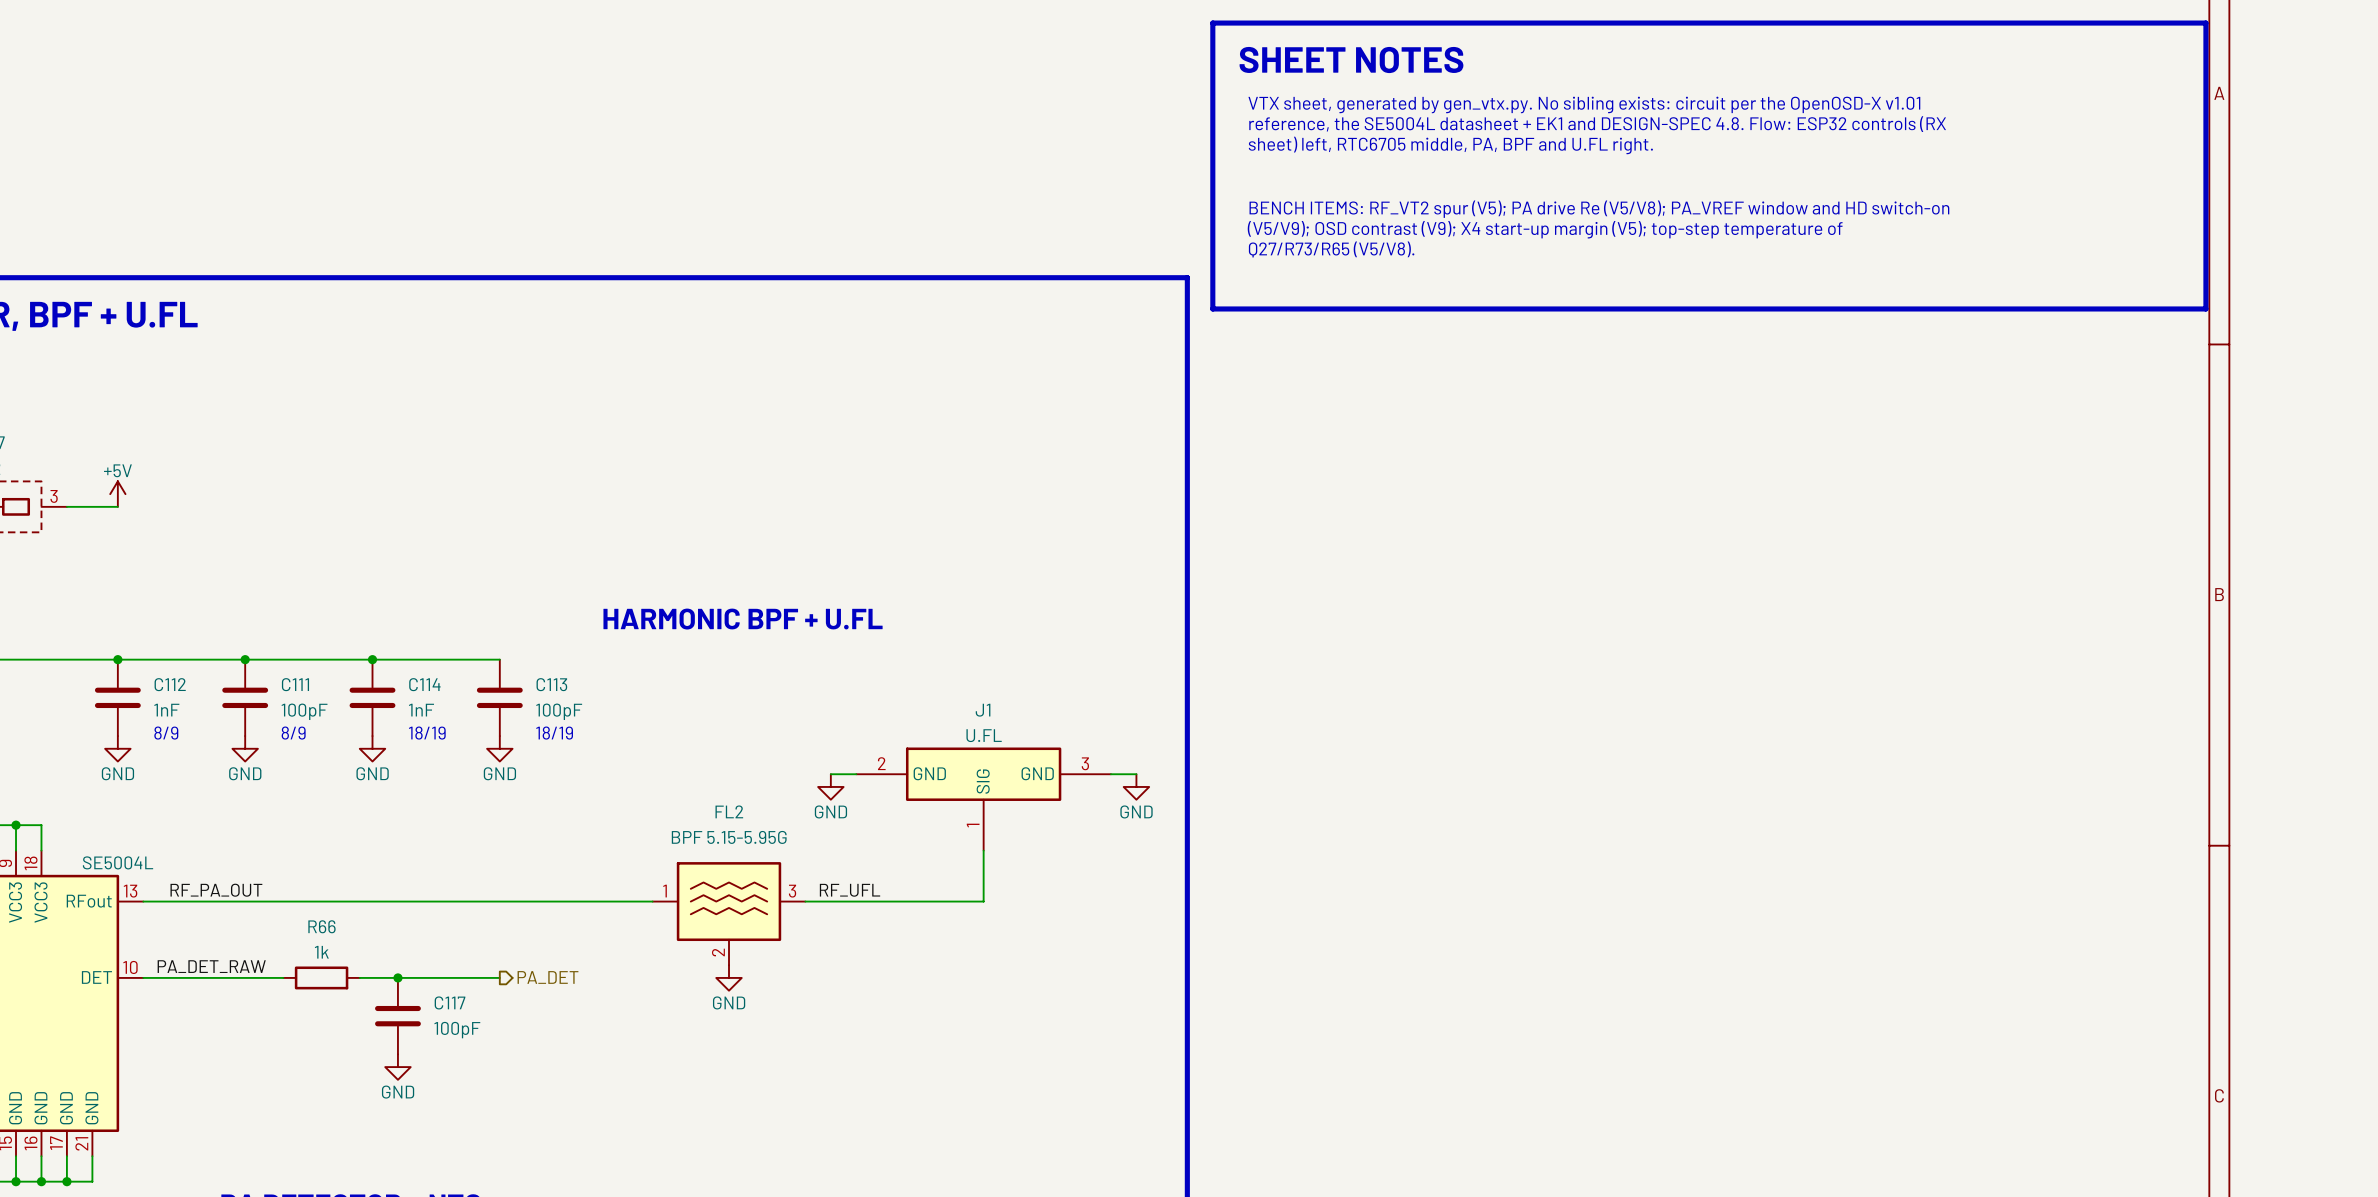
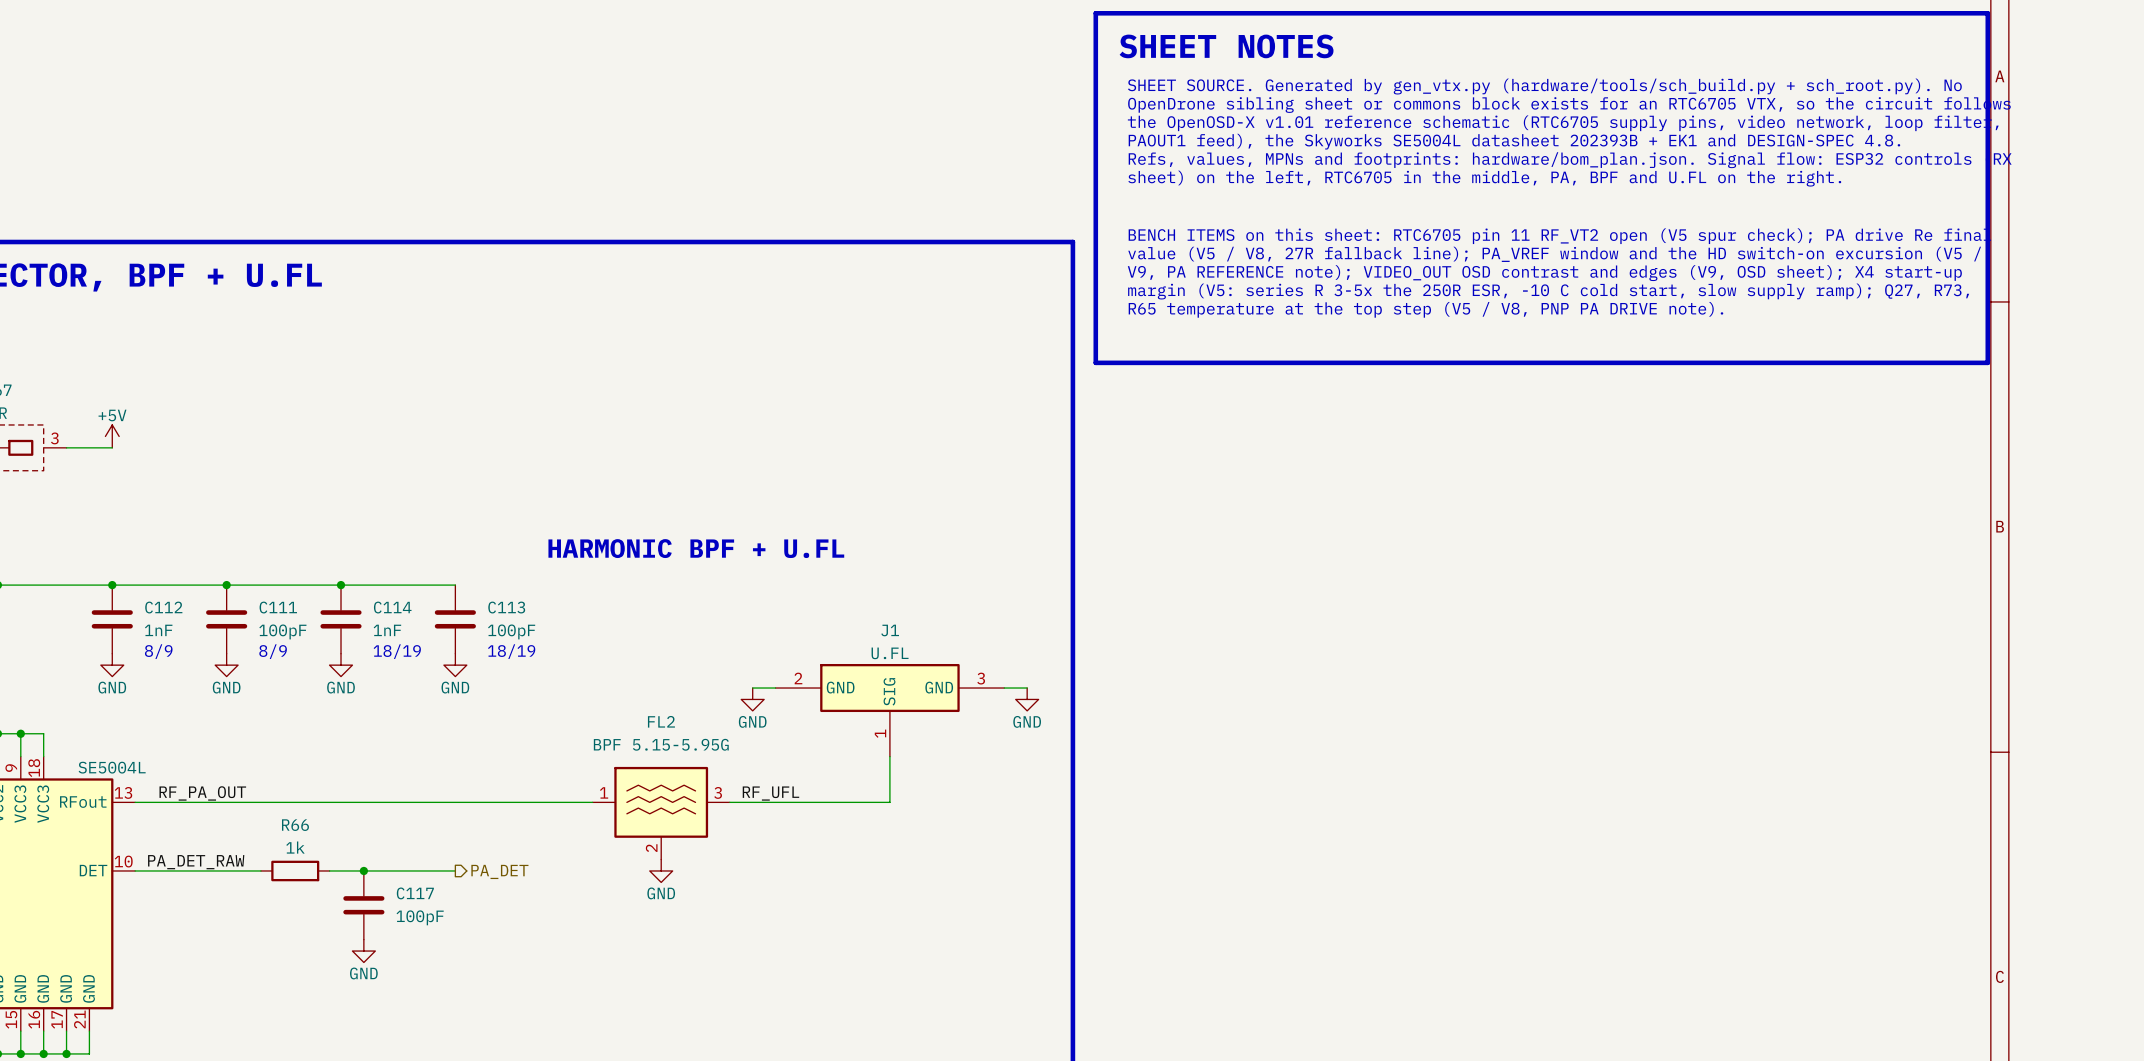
text: VTX sheet, generated by gen_vtx.py. No sibling exists: circuit per the OpenOSD-X v1.01 (1584, 104) -> SHEET SOURCE. Generated by gen_vtx.py (hardware/tools/sch_build.py + sch_root.py). No (1544, 86)
text: reference, the SE5004L datasheet + EK1 and DESIGN-SPEC 4.8. Flow: ESP32 controls (RX (1597, 124) -> OpenDrone sibling sheet or commons block exists for an RTC6705 VTX, so the circuit follows (1569, 105)
text: sheet) left, RTC6705 middle, PA, BPF and U.FL right. (1450, 145) -> the OpenOSD-X v1.01 reference schematic (RTC6705 supply pins, video network, loop filter, (1563, 123)
text: none -> PAOUT1 feed), the Skyworks SE5004L datasheet 202393B + EK1 and DESIGN-SPEC 4.8. (1514, 141)
text: none -> Refs, values, MPNs and footprints: hardware/bom_plan.json. Signal flow: ESP32 controls (RX (1570, 160)
text: BENCH ITEMS: RF_VT2 spur (V5); PA drive Re (V5/V8); PA_VREF window and HD switch-on (1599, 209) -> sheet) on the left, RTC6705 in the middle, PA, BPF and U.FL on the right. (1484, 178)
text: (V5/V9); OSD contrast (V9); X4 start-up margin (V5); top-step temperature of (1545, 229) -> none
text: Q27/R73/R65 (V5/V8). (1331, 249) -> none
text: none -> BENCH ITEMS on this sheet: RTC6705 pin 11 RF_VT2 open (V5 spur check); PA drive Re final (1559, 236)
text: none -> value (V5 / V8, 27R fallback line); PA_VREF window and the HD switch-on excursion (V5 / (1554, 254)
line: (1212, 308) (2205, 308) -> (1095, 270) (1095, 362) (1987, 362) (1987, 270)
text: none -> V9, PA REFERENCE note); VIDEO_OUT OSD contrast and edges (V9, OSD sheet); X4 start-up (1544, 273)
text: none -> margin (V5: series R 3-5x the 250R ESR, -10 C cold start, slow supply ramp); Q27, R73, (1548, 291)
text: none -> R65 temperature at the top step (V5 / V8, PNP PA DRIVE note). (1425, 309)

